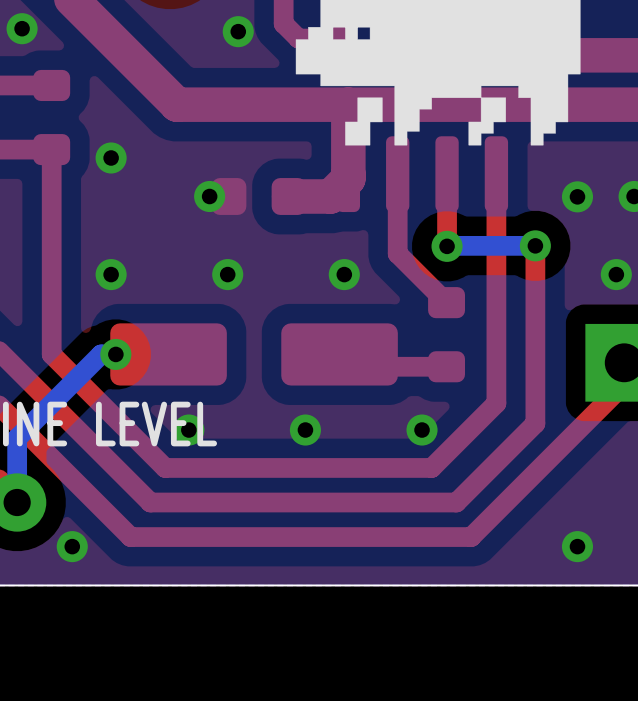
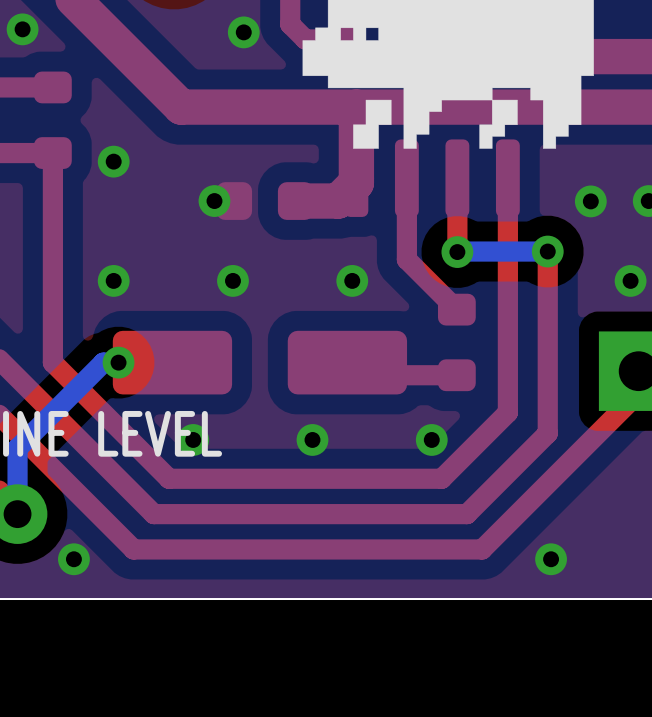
via position: (577, 546) -> (551, 559)

